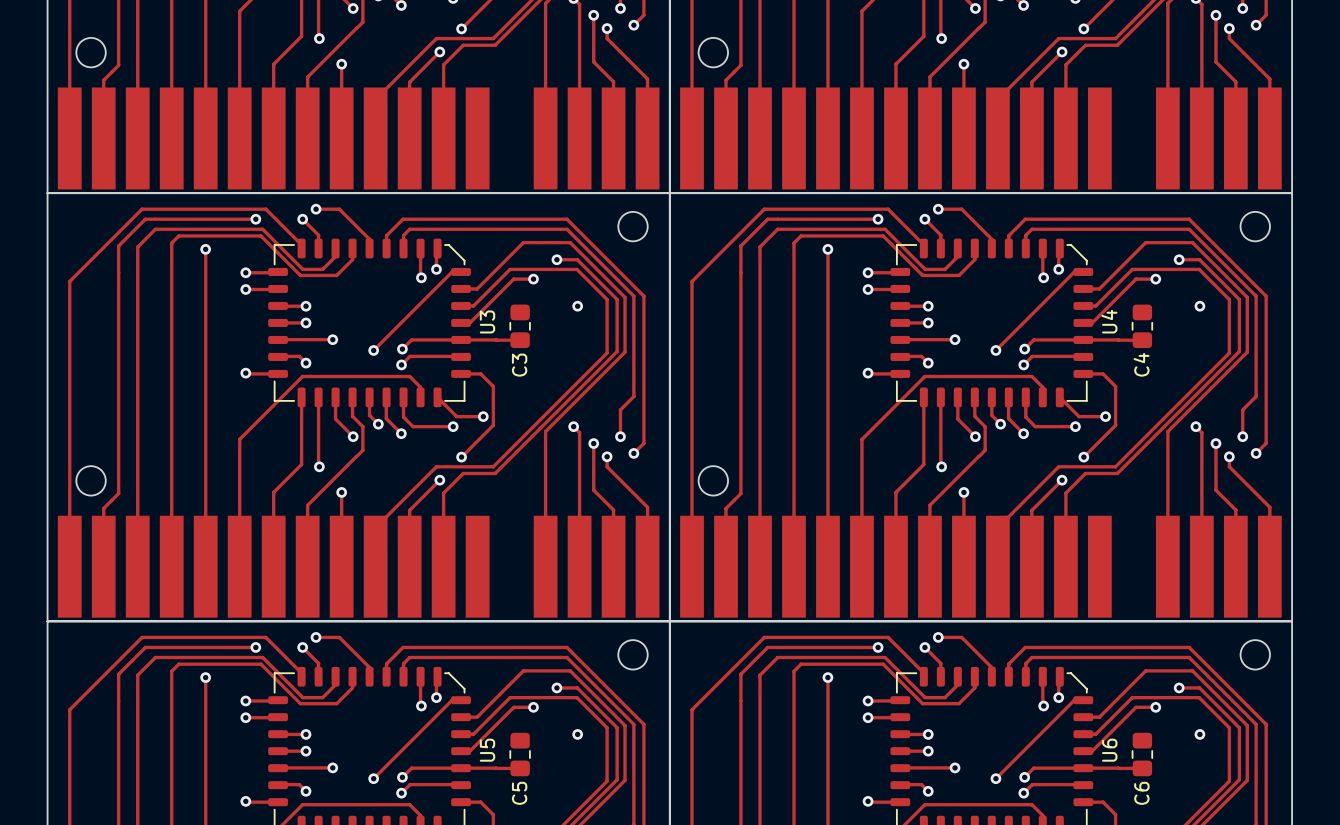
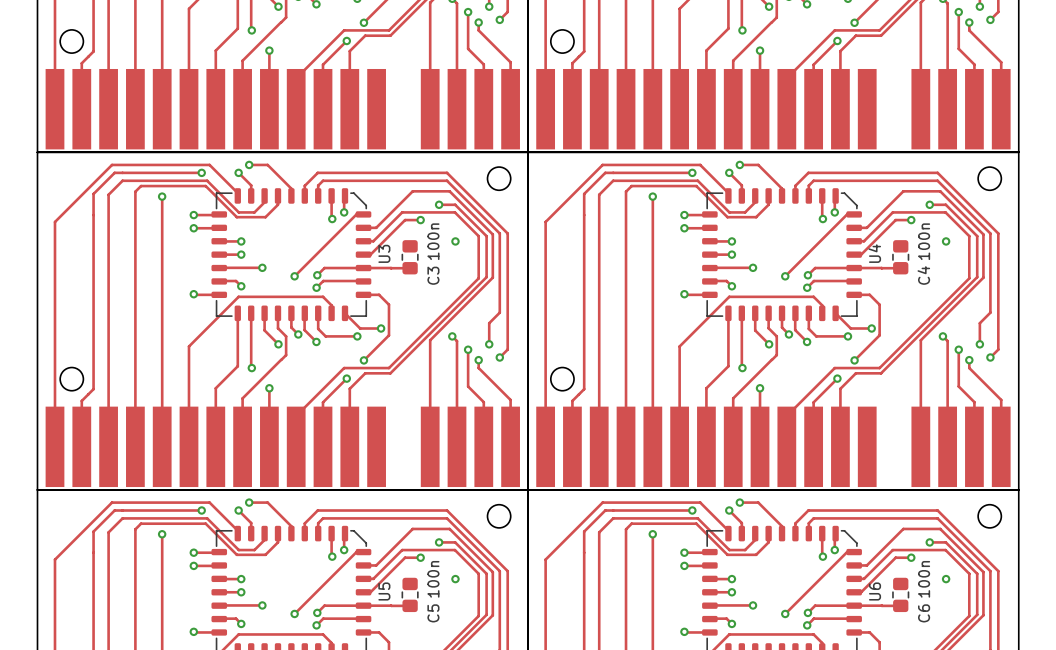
text: none -> 100n (433, 241)
text: none -> 100n (924, 241)
C4 name position: C4 (1141, 364) -> C4 (923, 275)
C3 name position: C3 (519, 365) -> C3 (433, 275)
text: none -> 100n (433, 579)
text: none -> 100n (924, 579)
C5 name position: C5 (519, 793) -> C5 (433, 613)
C6 name position: C6 (1141, 793) -> C6 (924, 613)

